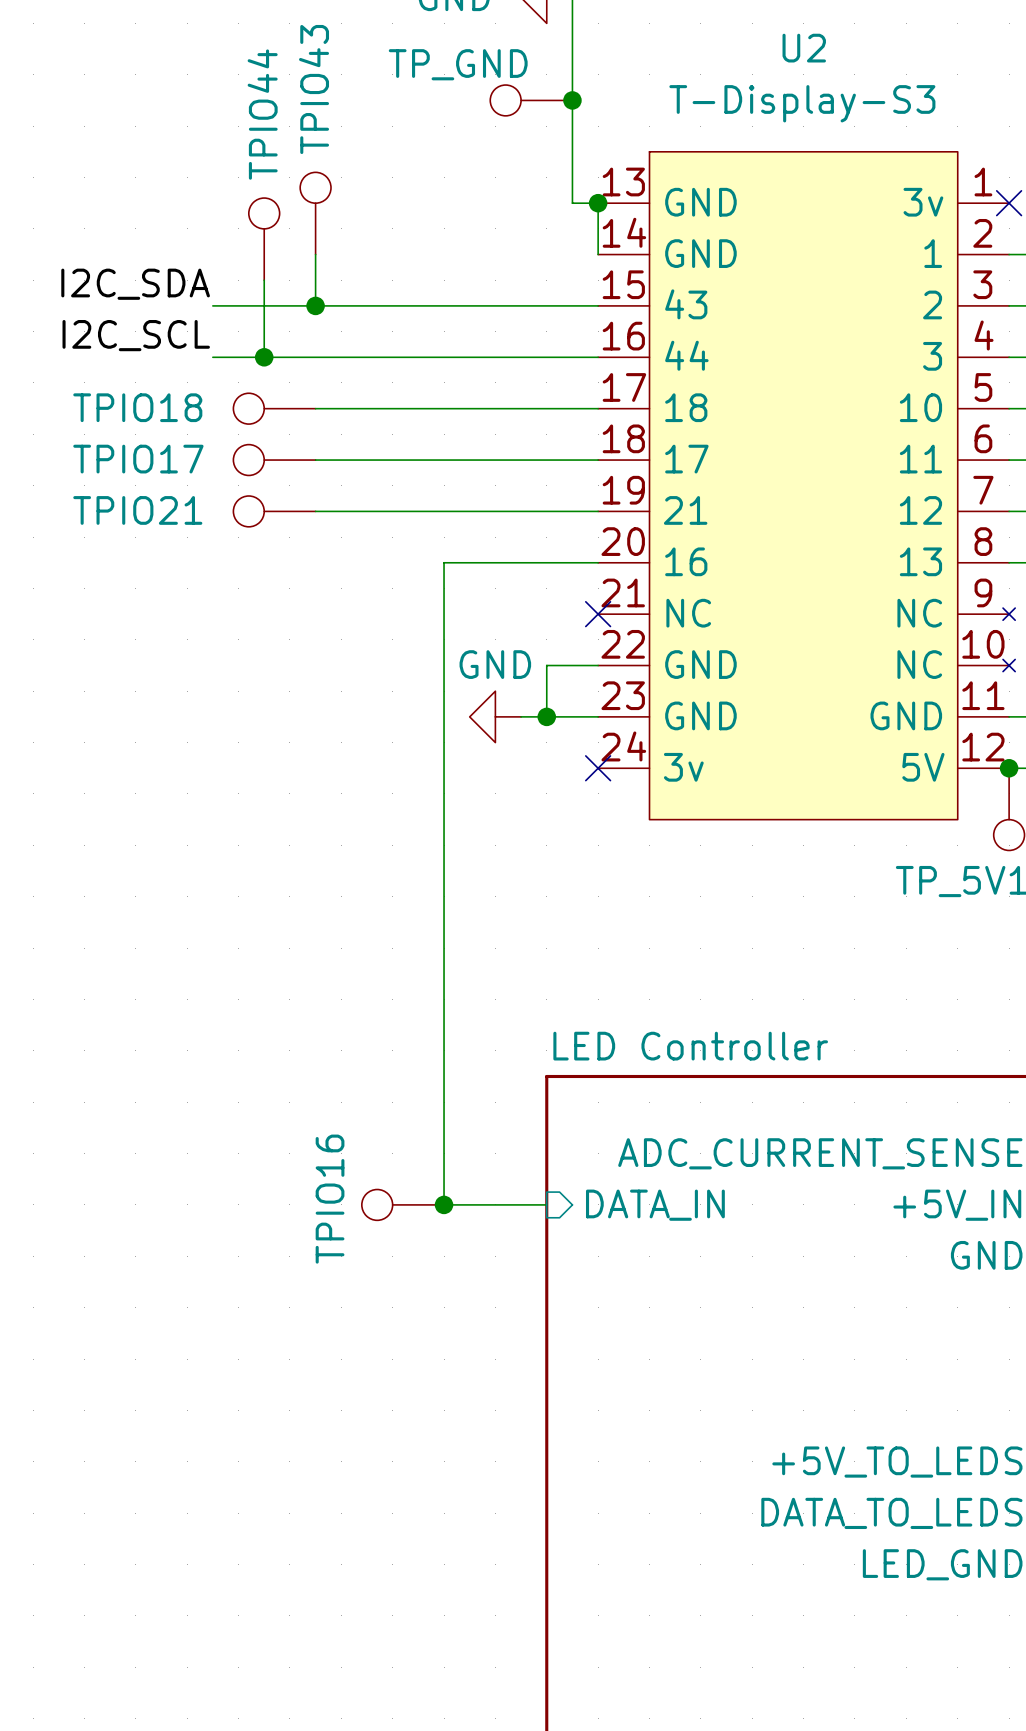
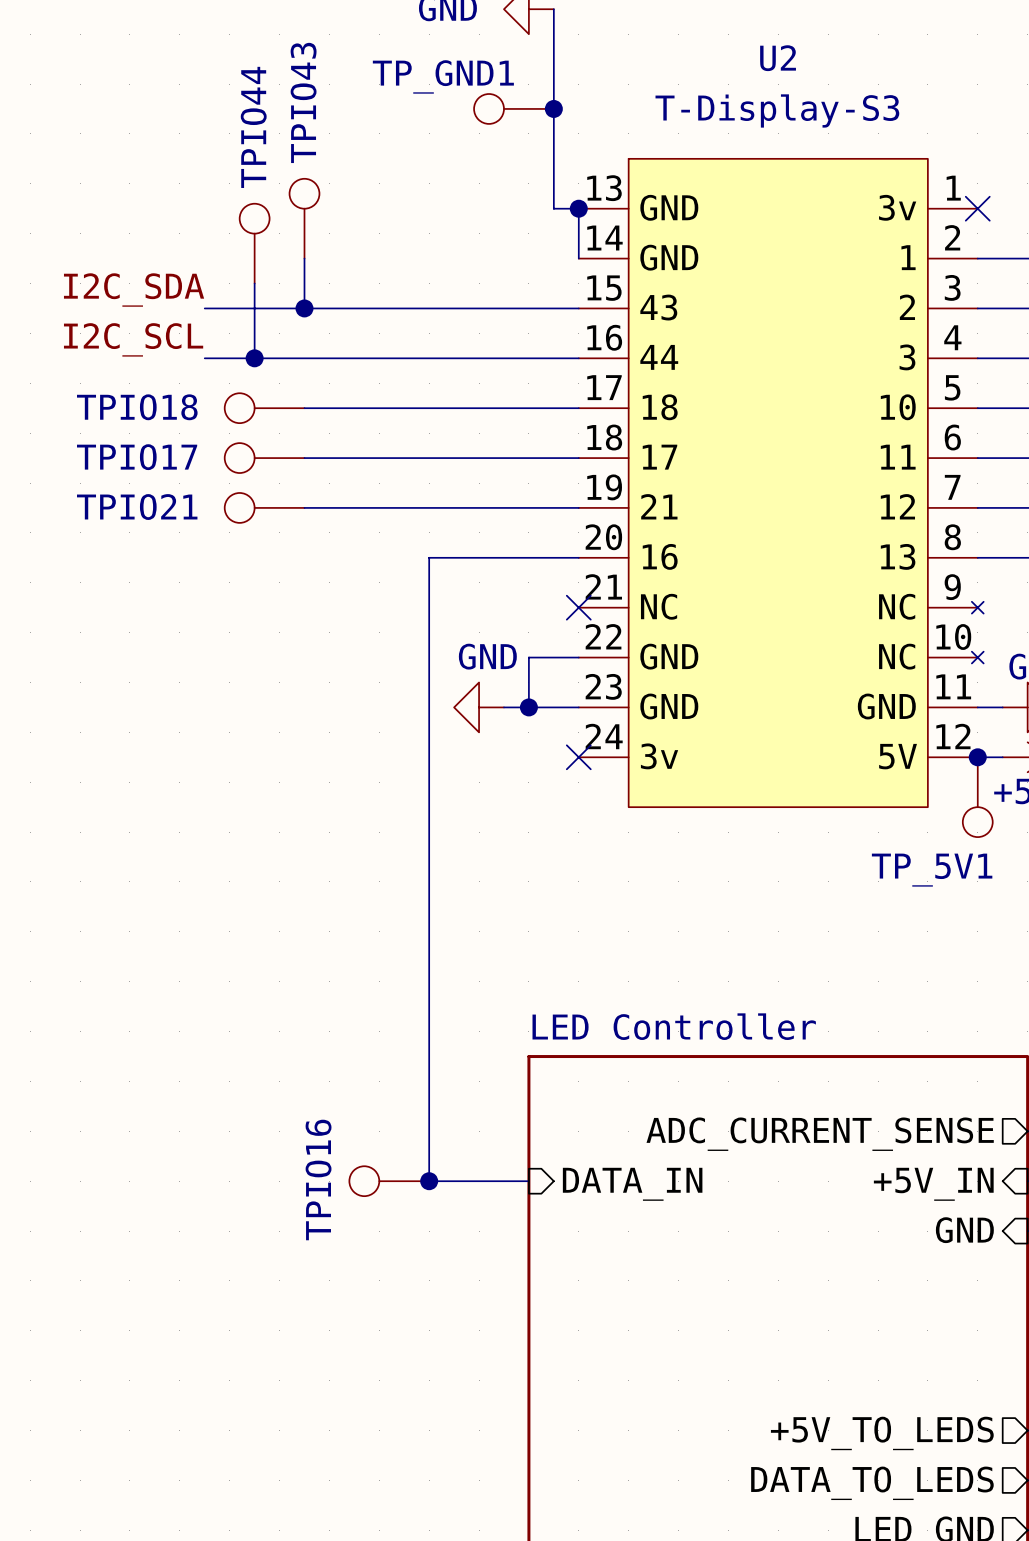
TP_GND name: TP_GND (458, 64) -> TP_GND1 (443, 76)

